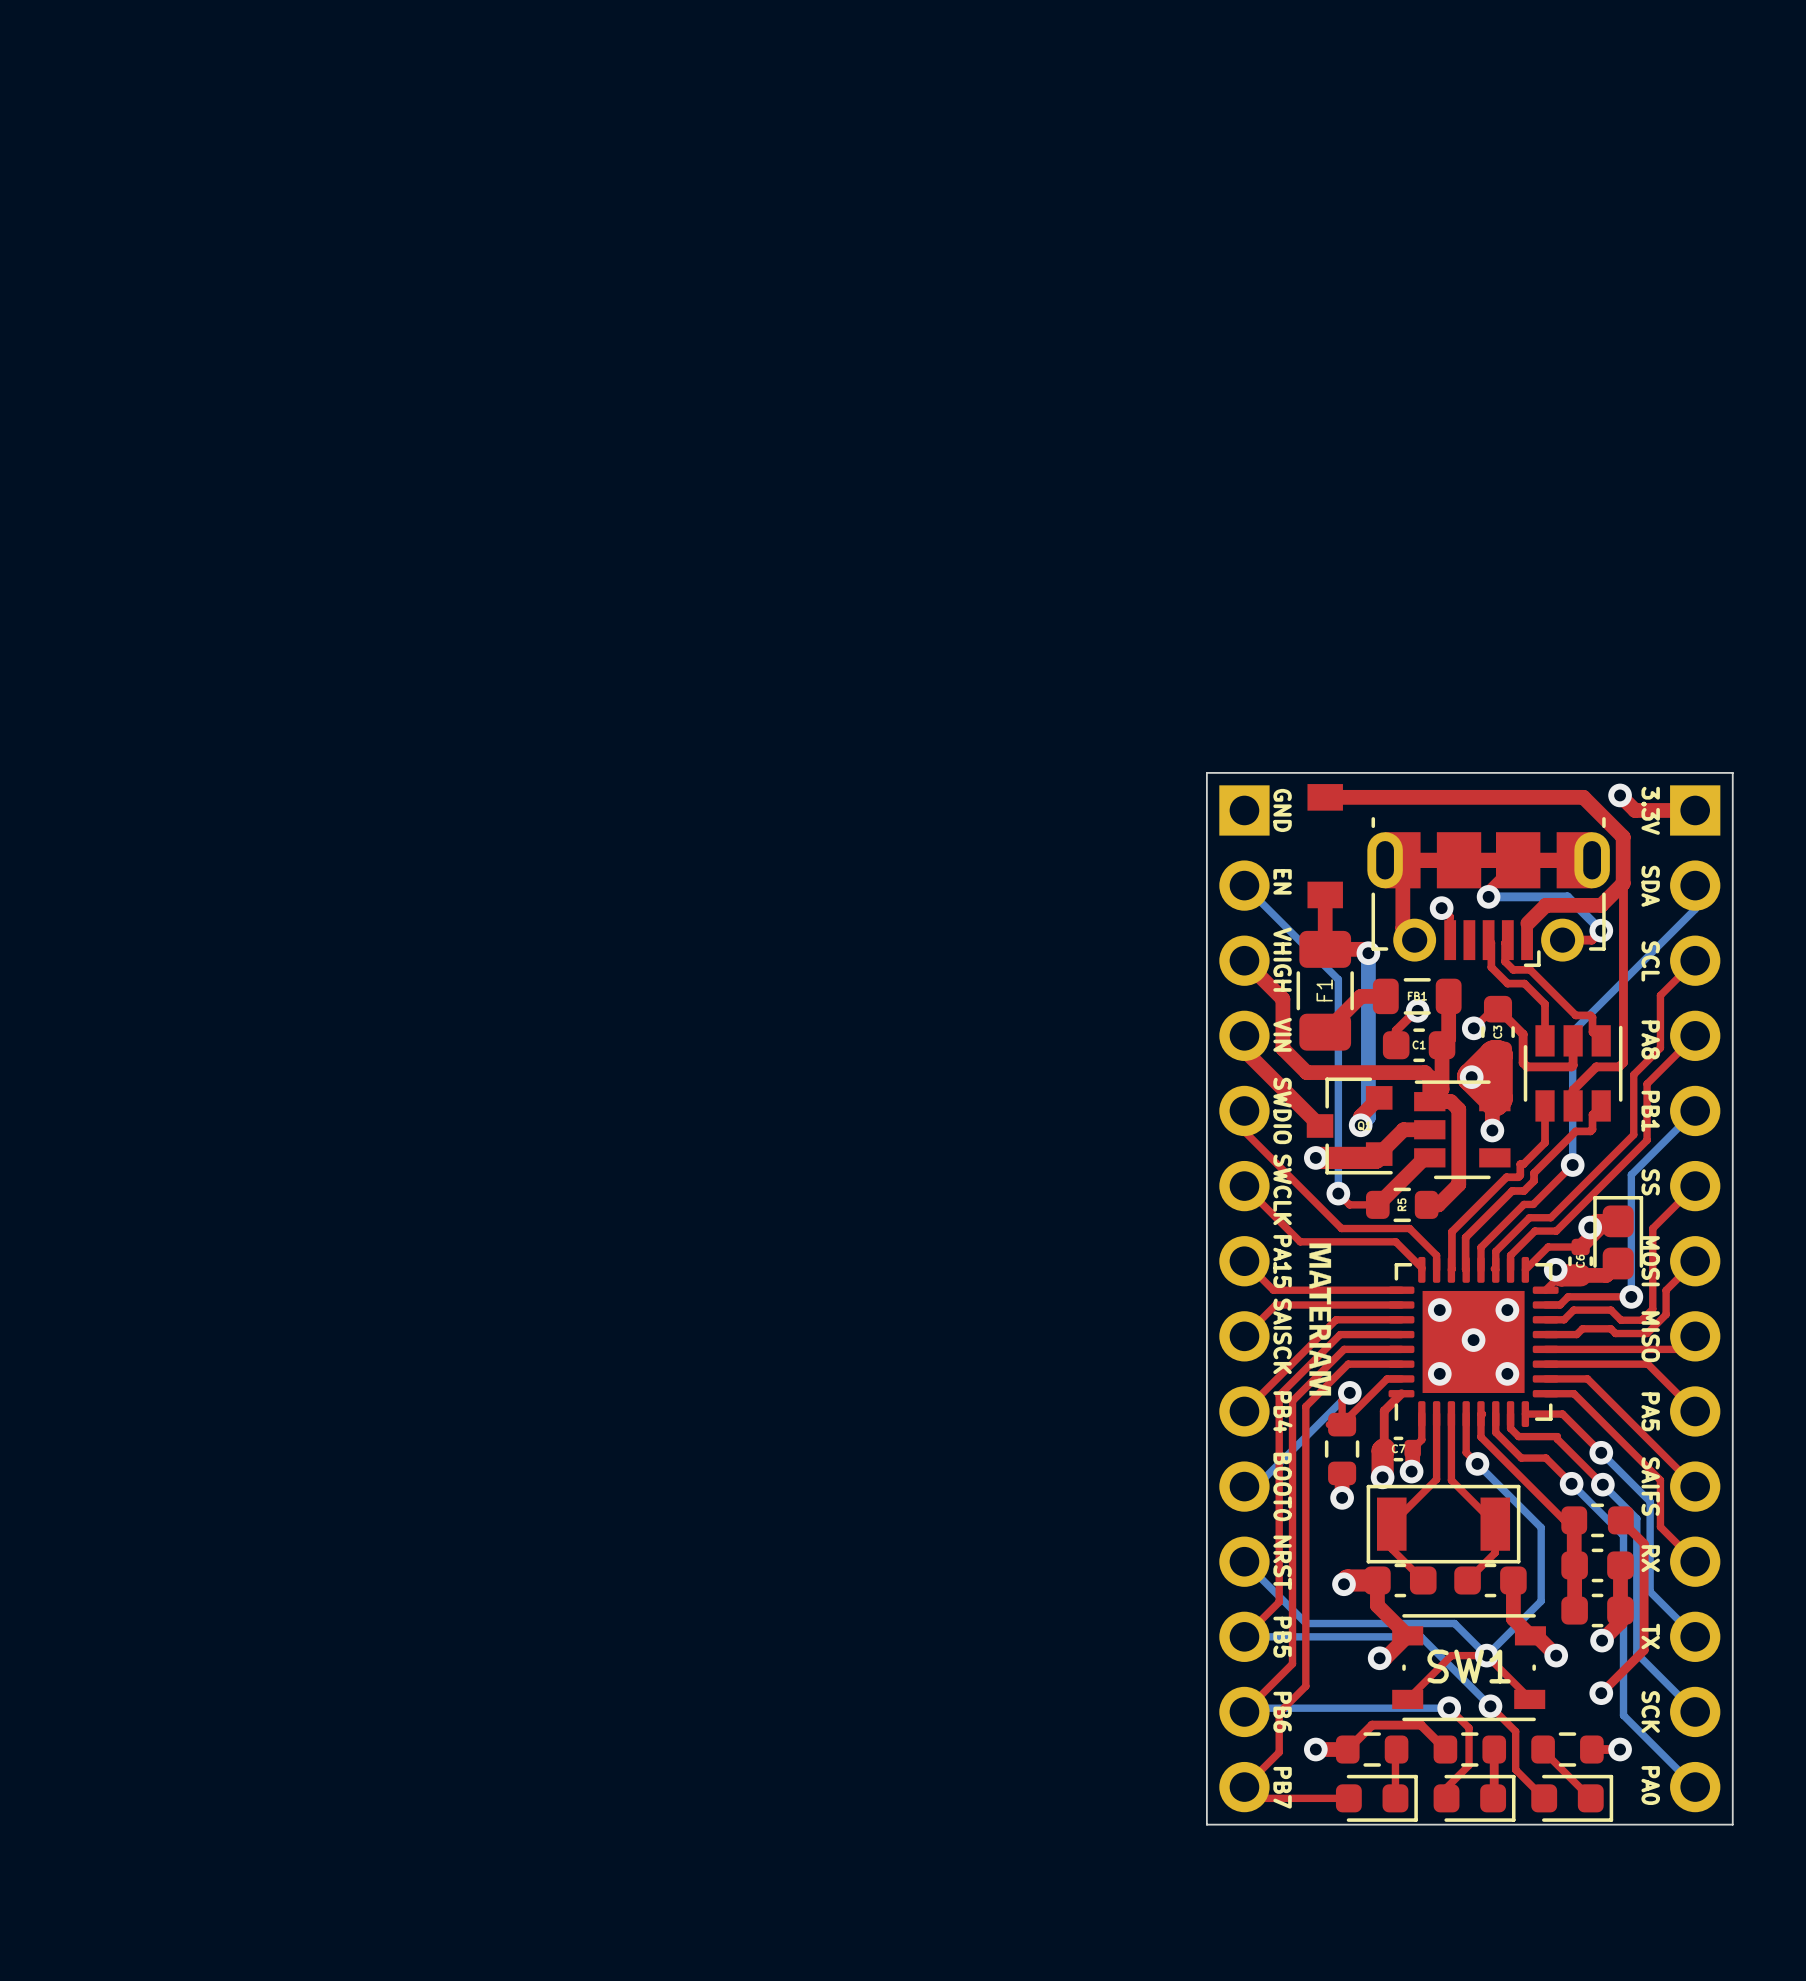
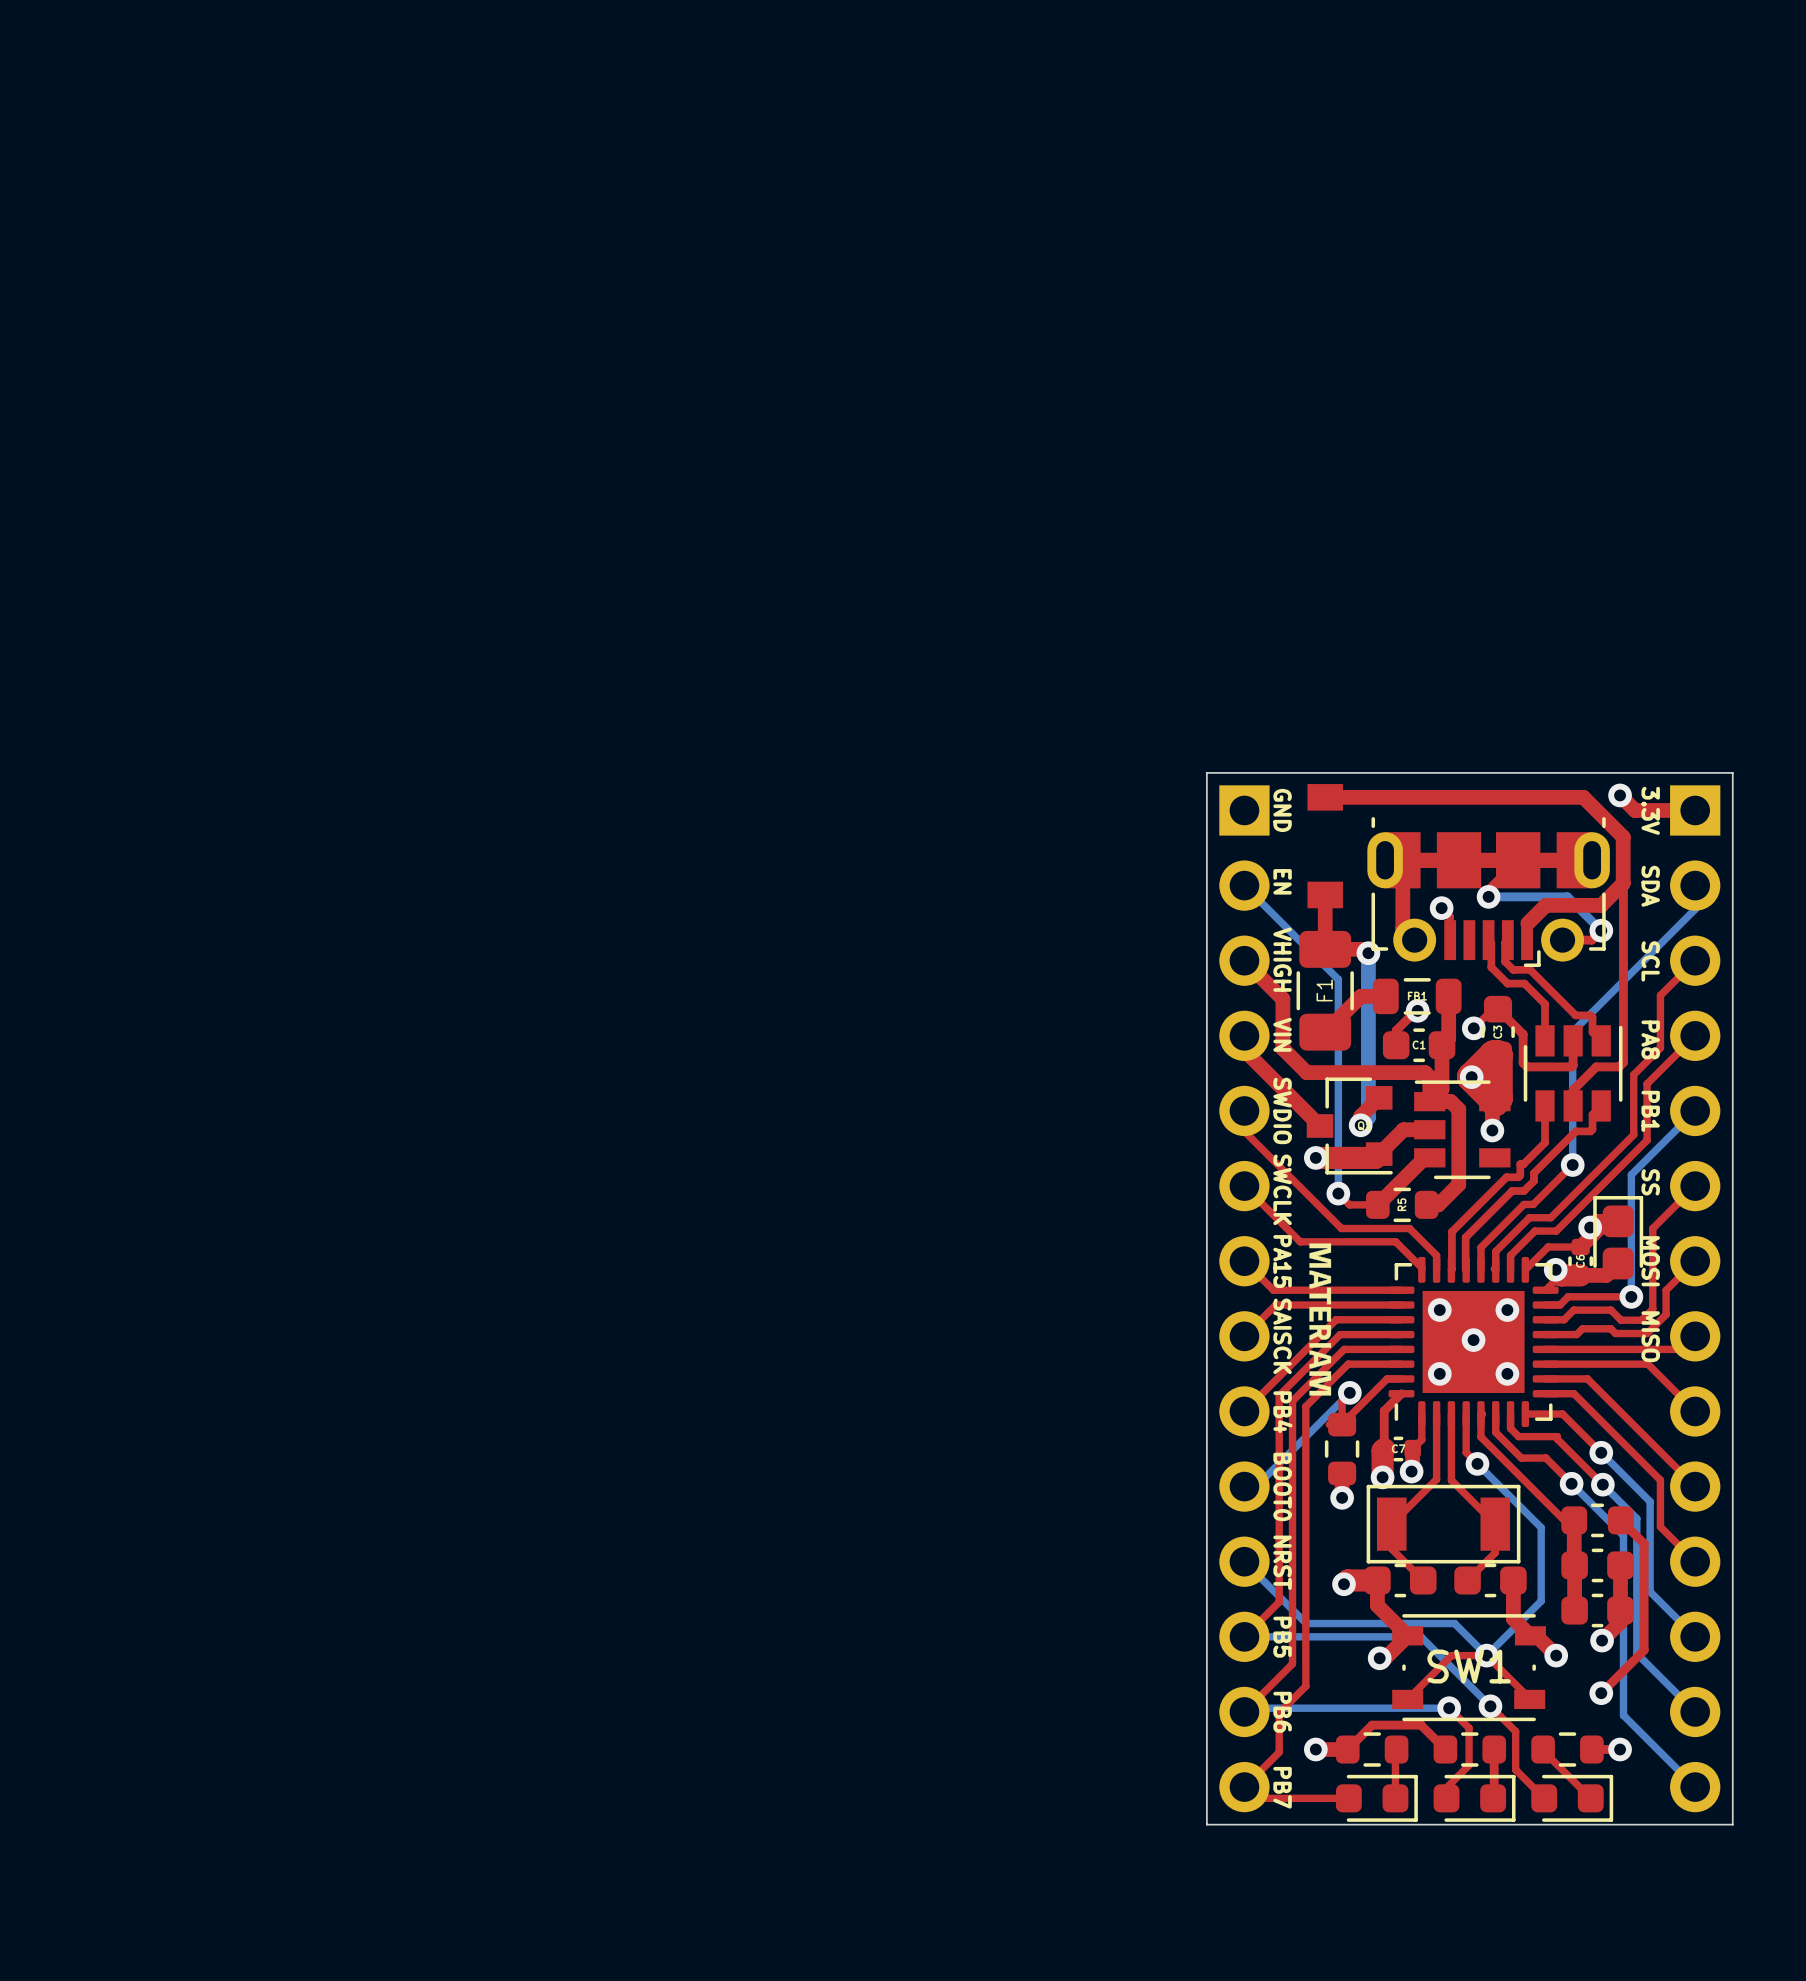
text: PA5 (1650, 1411) -> none
text: SAIFS (1650, 1486) -> none
text: RX (1650, 1558) -> none
text: TX (1650, 1636) -> none
text: SCK (1650, 1711) -> none
text: PA0 (1650, 1785) -> none

